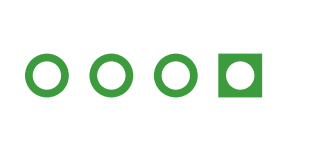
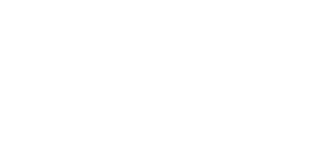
part: (143, 75) -> none

